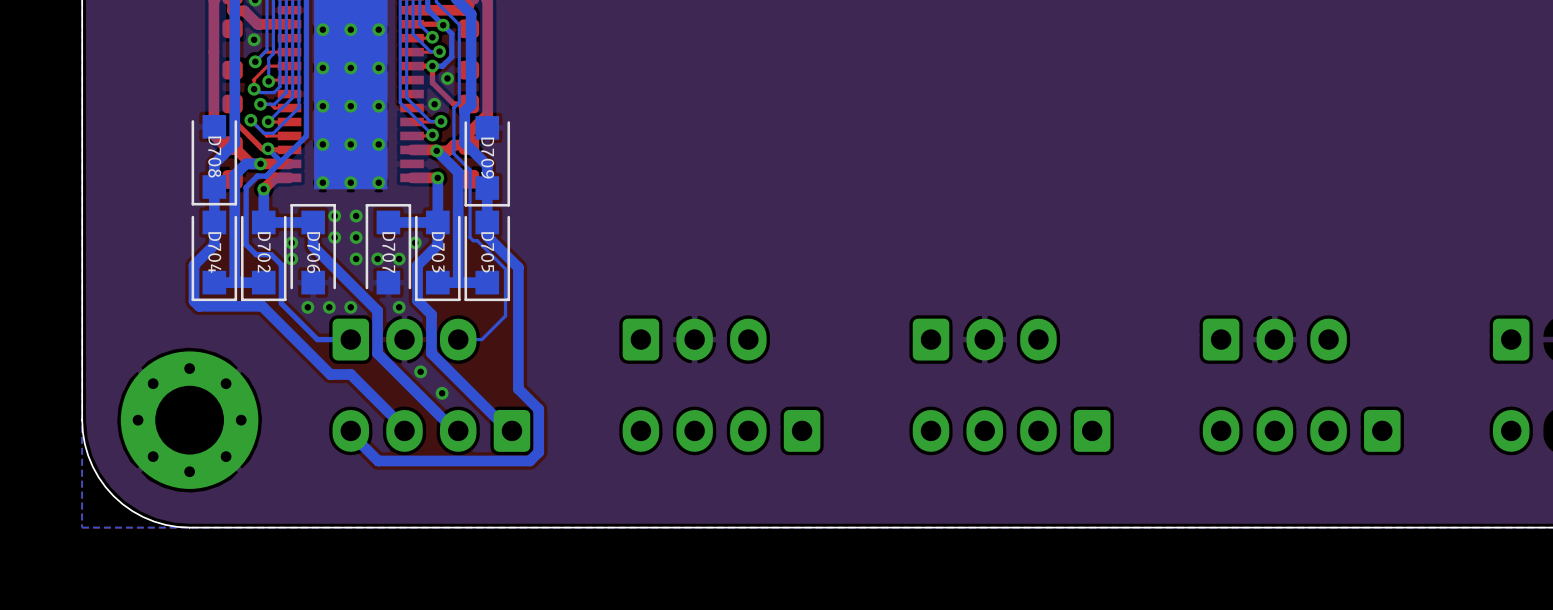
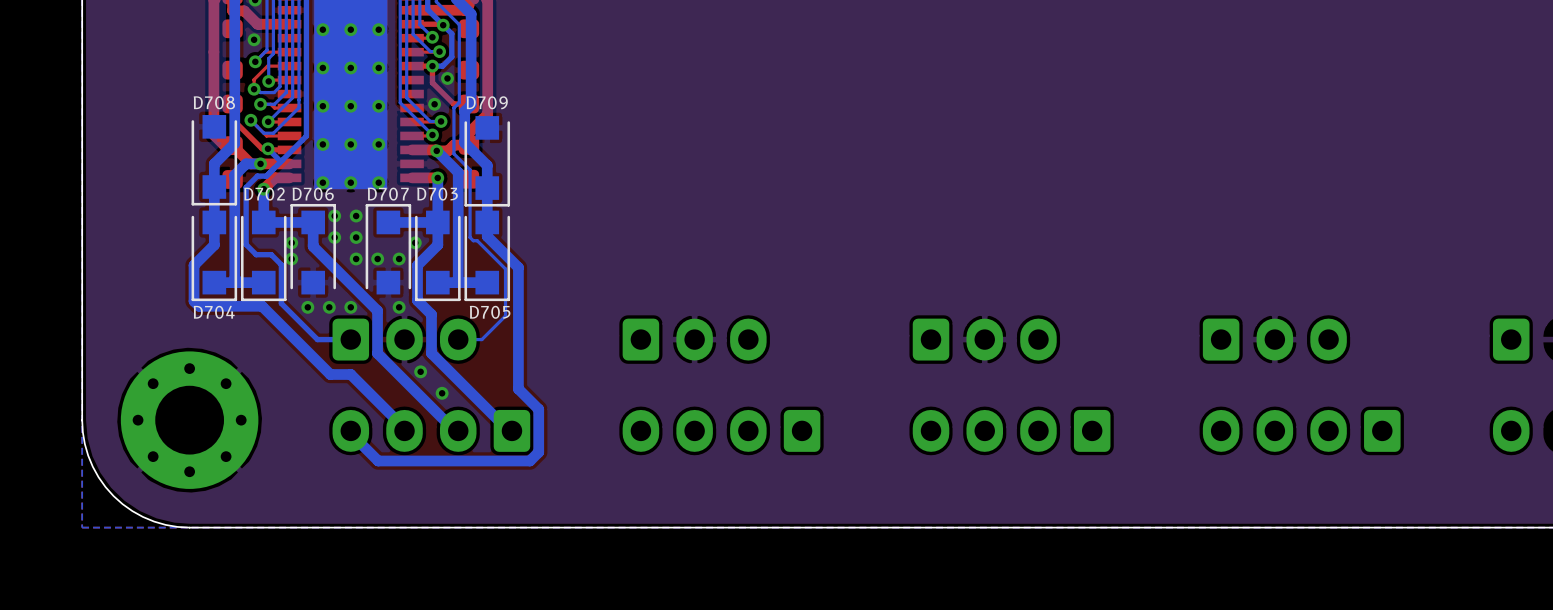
D708 name rotation: 0° (214, 156) -> 90° counterclockwise (214, 102)
D709 name rotation: 0° (487, 157) -> 90° counterclockwise (487, 102)
D704 name rotation: 0° (214, 252) -> 90° counterclockwise (214, 312)
D704 name position: D704 (214, 252) -> D704 (214, 312)
D702 name rotation: 0° (264, 252) -> 90° counterclockwise (264, 194)
D706 name rotation: 0° (313, 252) -> 90° counterclockwise (313, 194)
D707 name rotation: 0° (388, 252) -> 90° counterclockwise (388, 194)
D703 name rotation: 0° (438, 252) -> 90° counterclockwise (437, 194)
D705 name rotation: 0° (487, 252) -> 90° counterclockwise (490, 312)
D705 name position: D705 (487, 252) -> D705 (490, 312)

